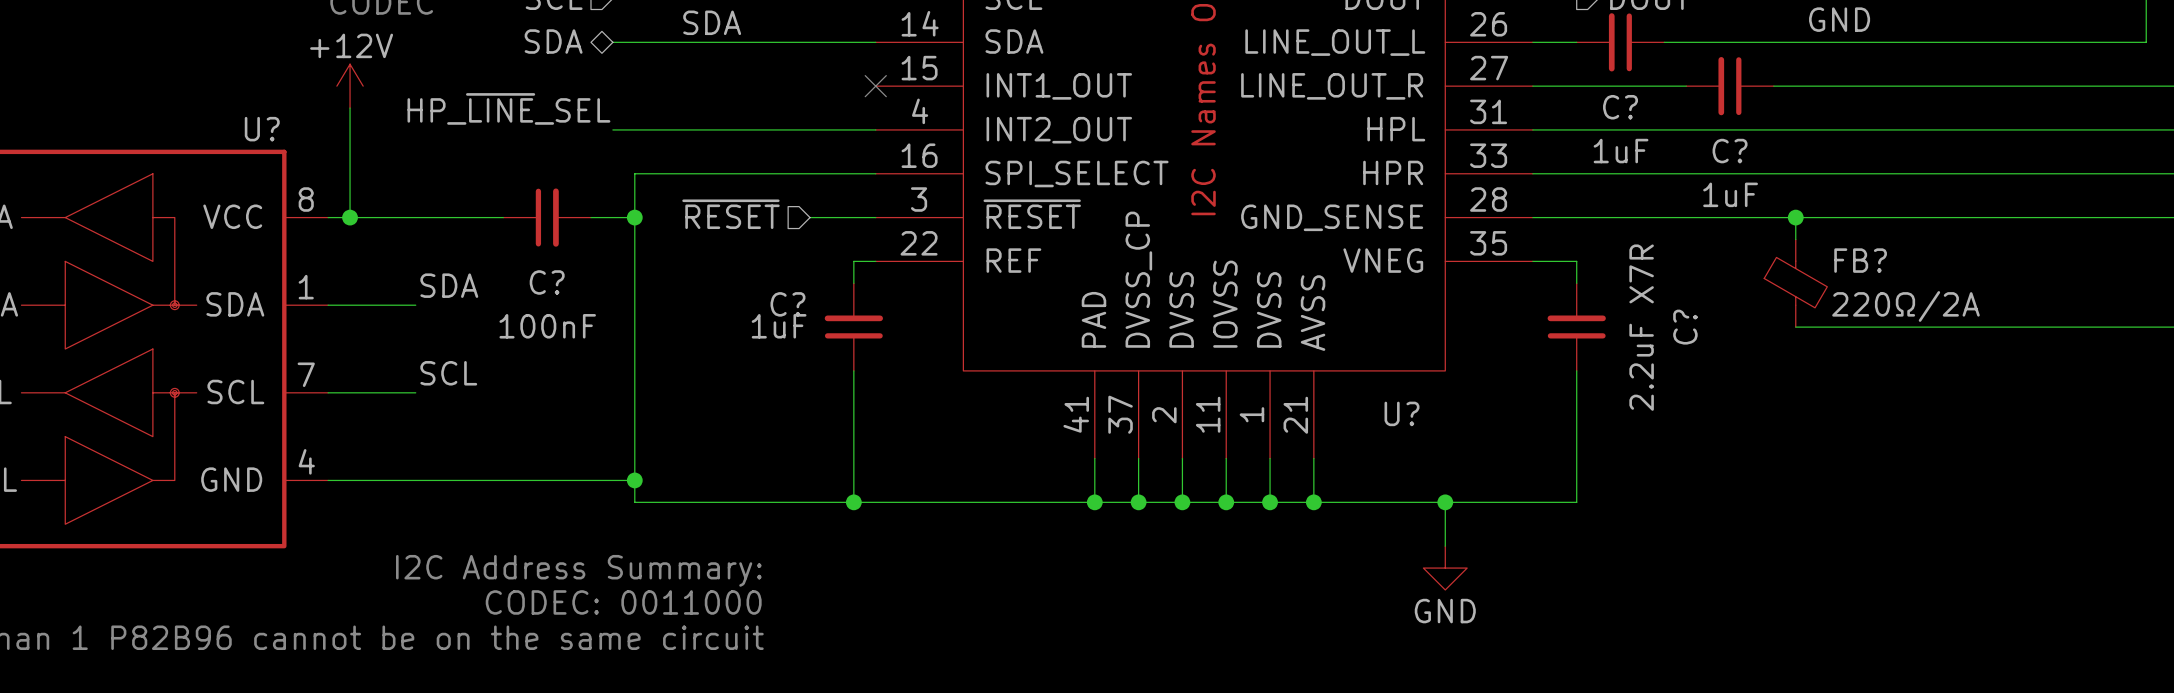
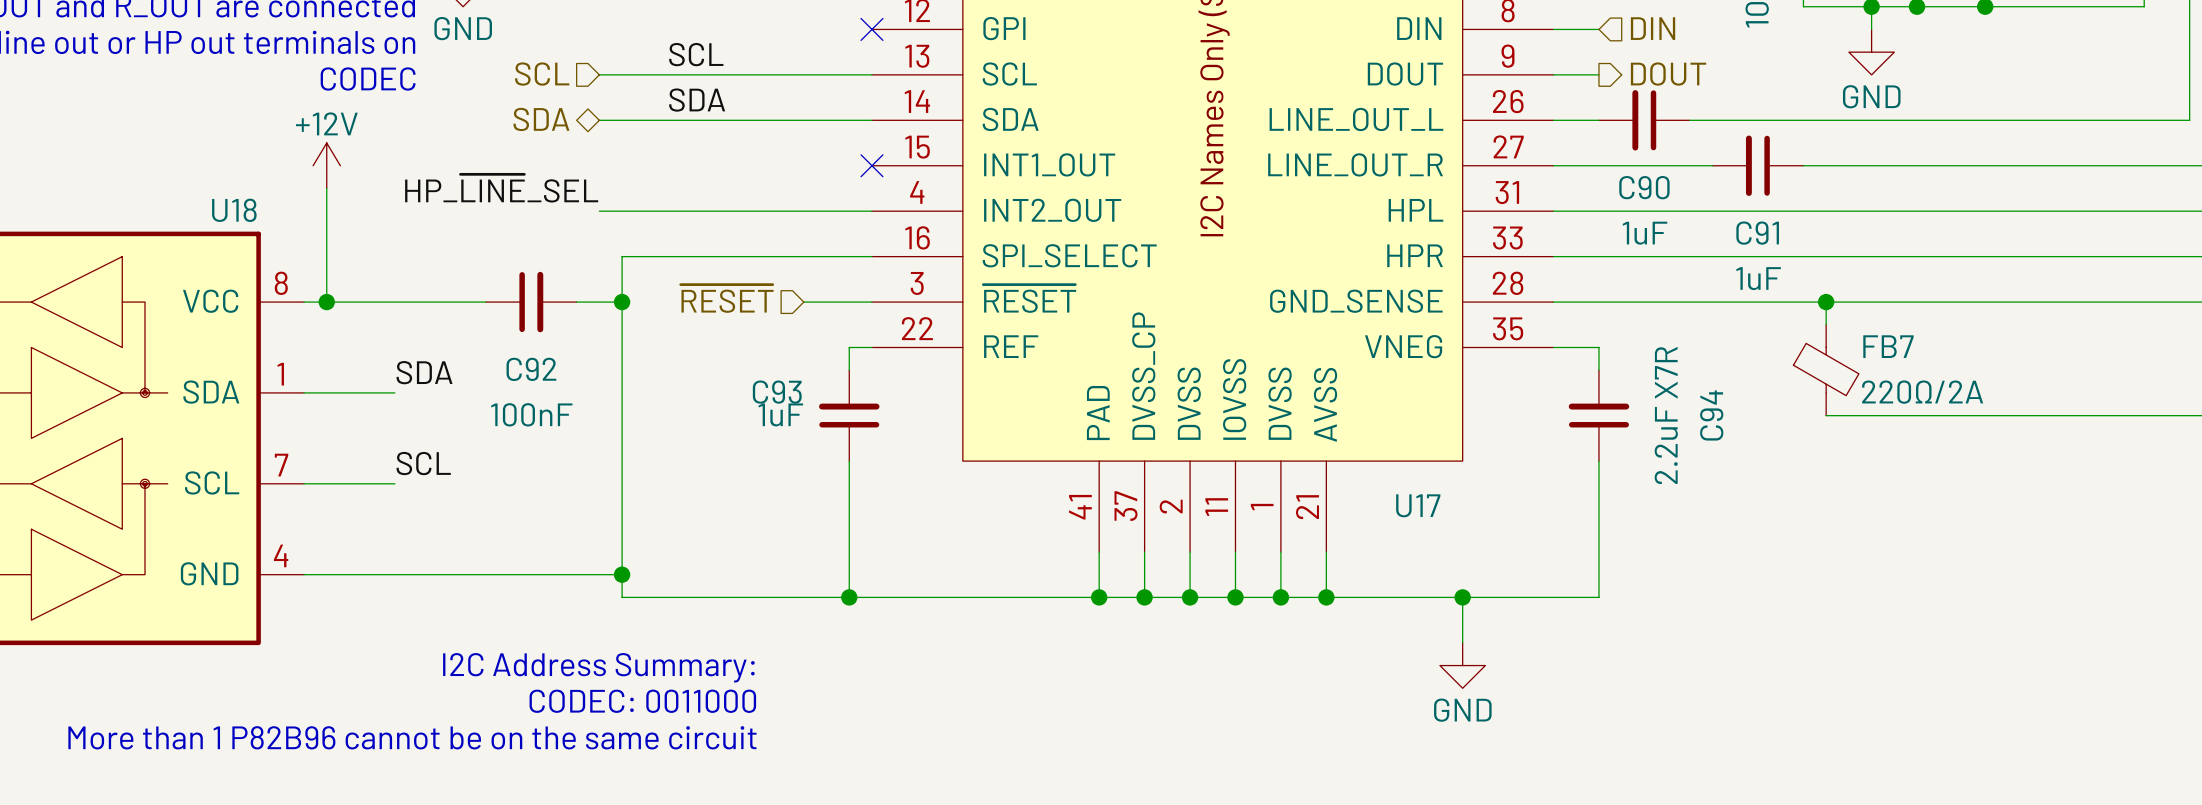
C? name: C? (1620, 107) -> C90 (1644, 187)
U? name: U? (262, 129) -> U18 (234, 210)
C? name: C? (1730, 151) -> C91 (1757, 233)
FB? name: FB? (1860, 260) -> FB7 (1888, 346)
C? name: C? (547, 282) -> C92 (531, 369)
C? name: C? (787, 304) -> C93 (777, 392)
C? name: C? (1685, 327) -> C94 (1711, 415)
U? name: U? (1401, 413) -> U17 (1418, 505)

